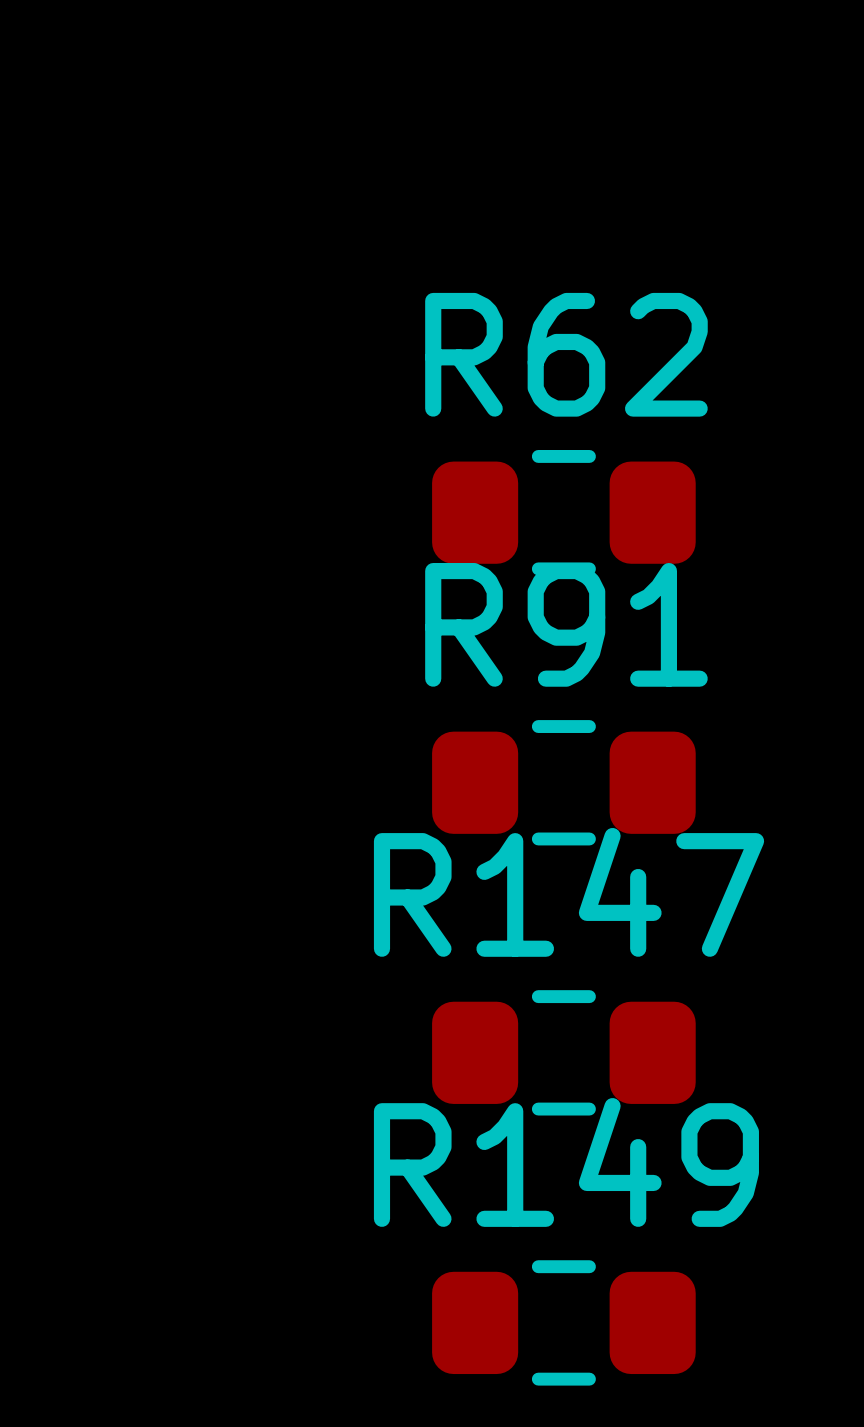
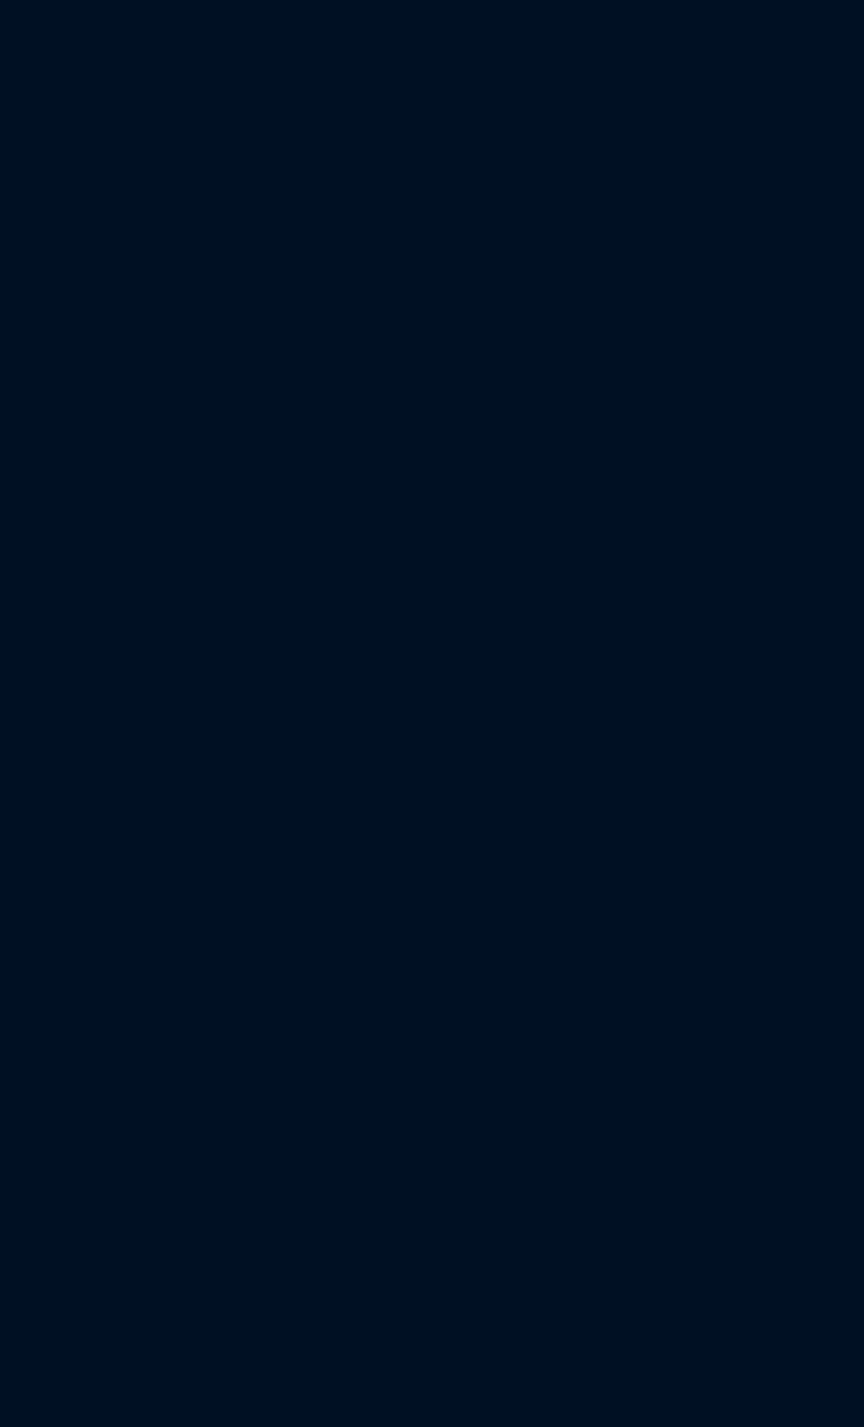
R62: (563, 512) -> none
R91: (563, 782) -> none
R147: (563, 1052) -> none
R149: (563, 1322) -> none

